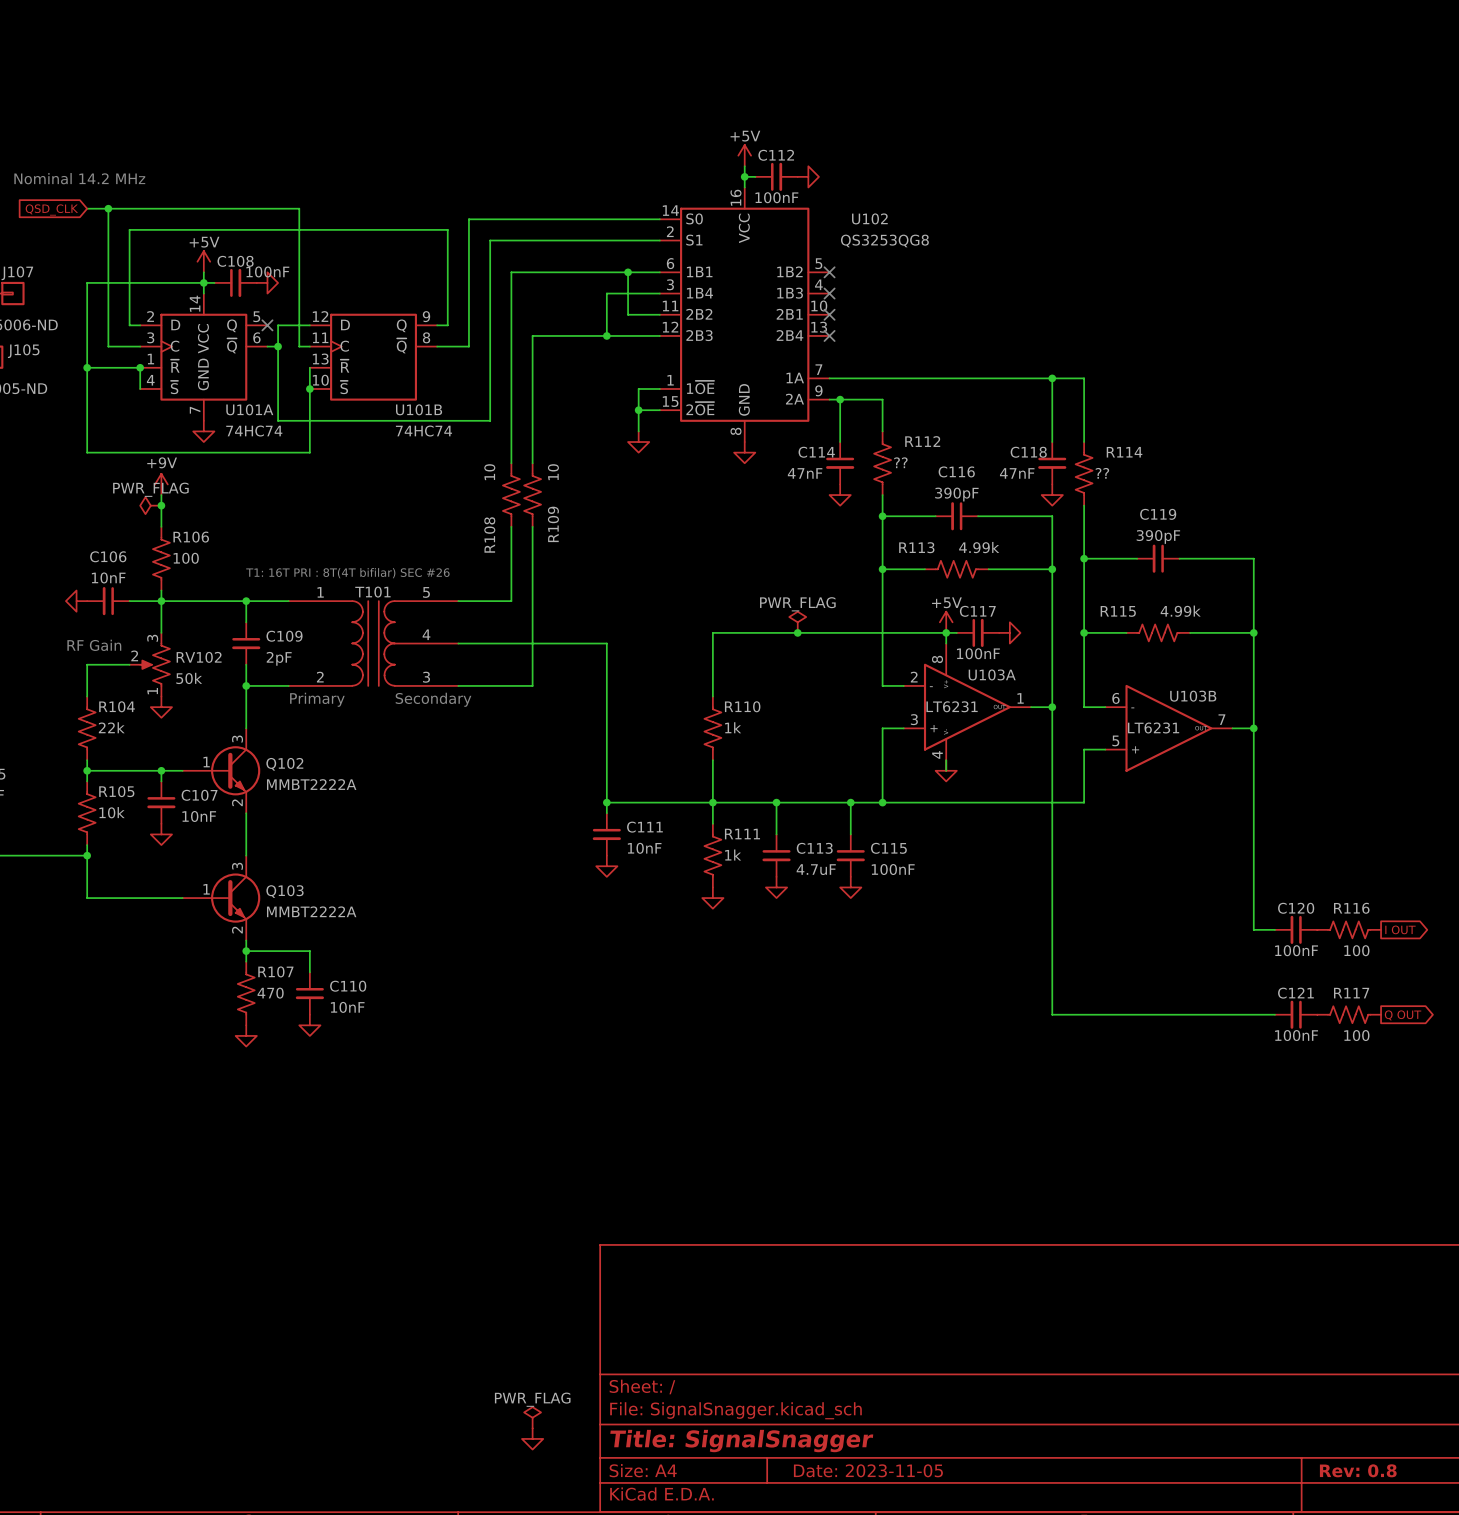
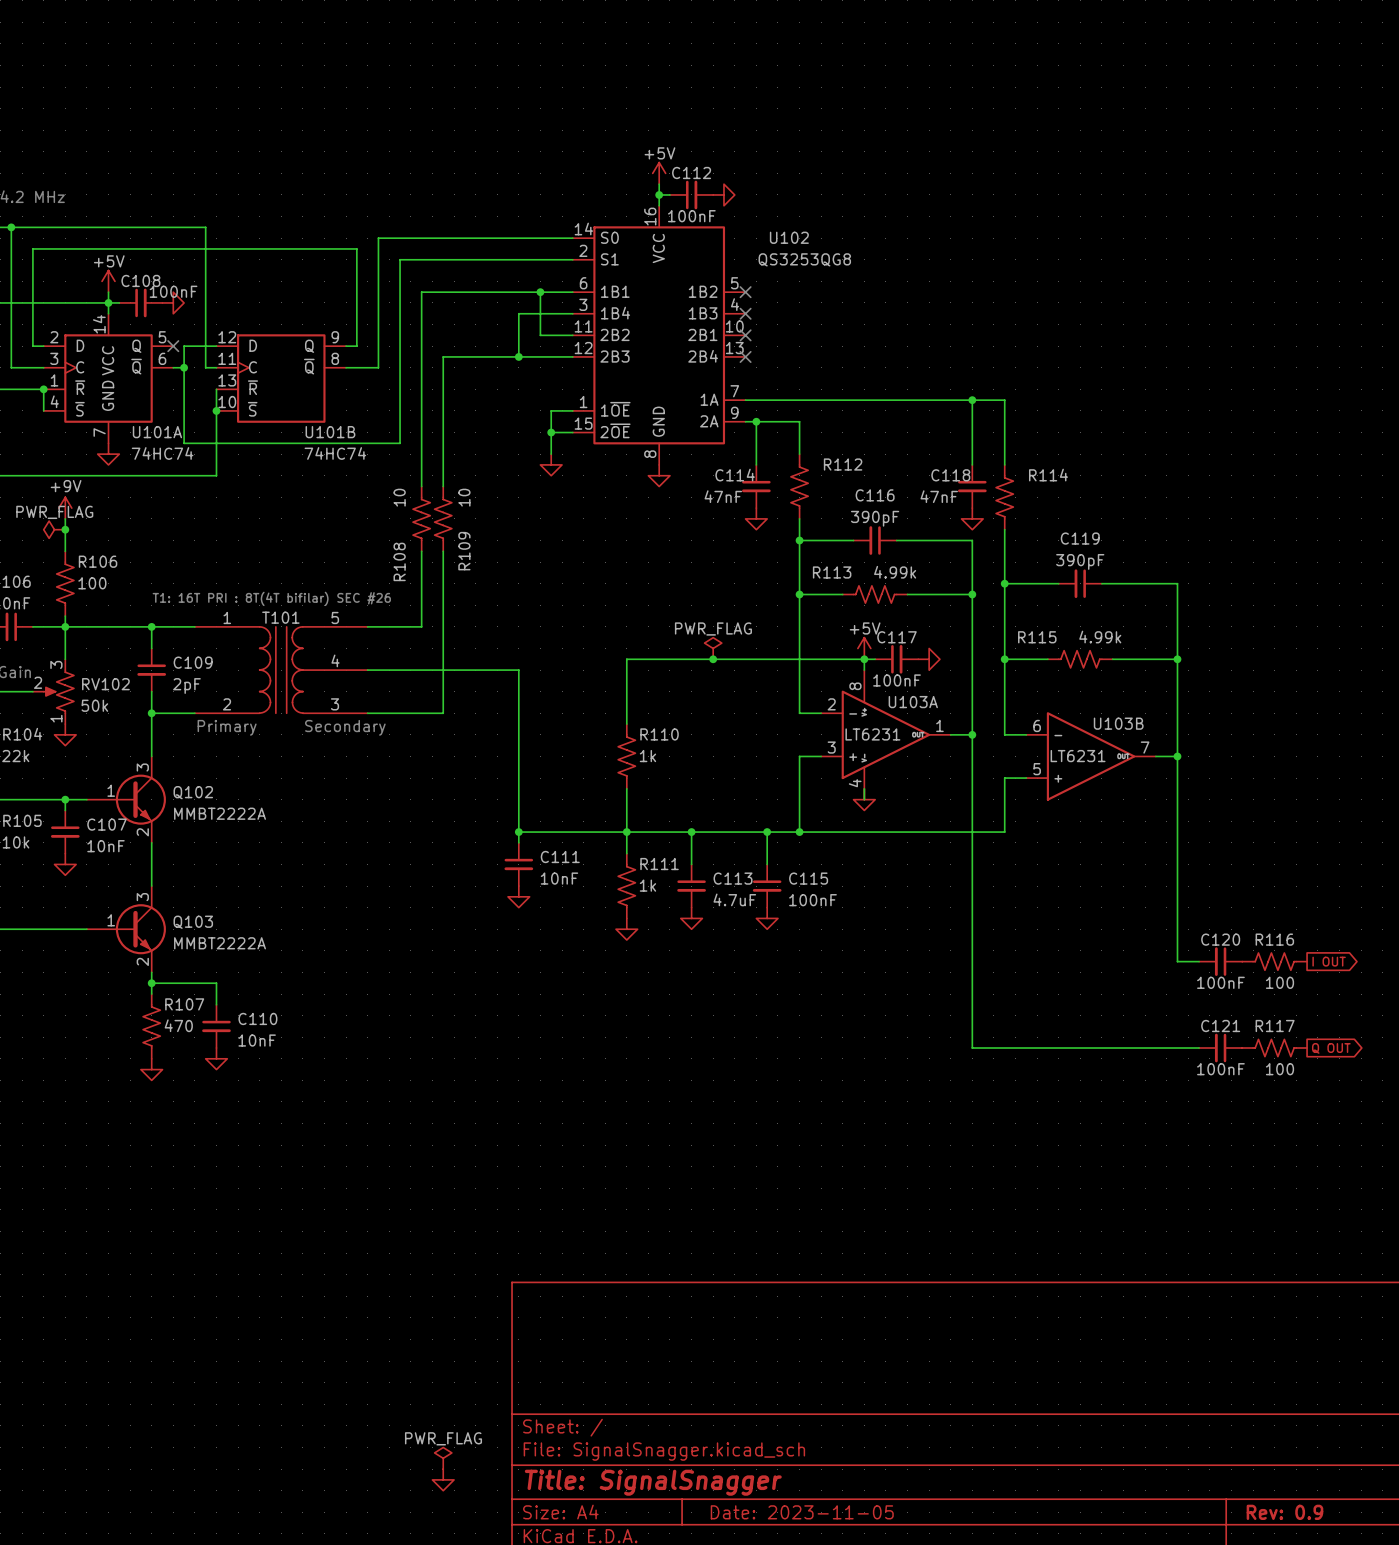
R112 value: ?? (900, 462) -> none
R114 value: ?? (1102, 473) -> none
title block: Rev: 0.8 (1358, 1470) -> Rev: 0.9 (1284, 1512)

